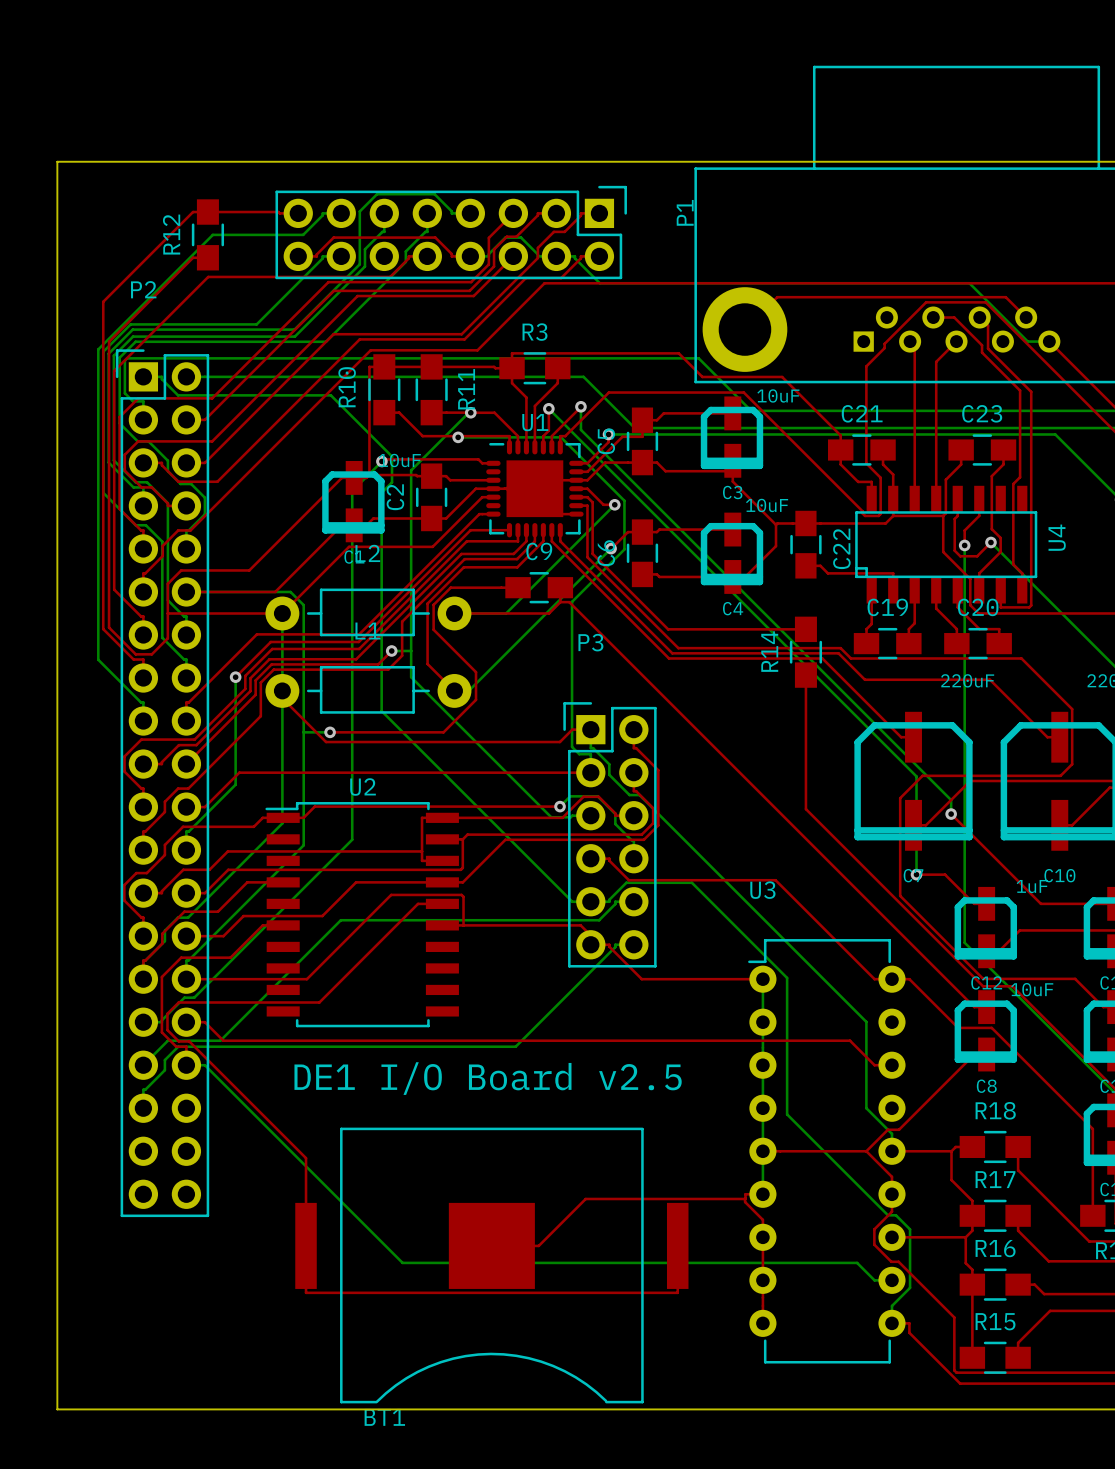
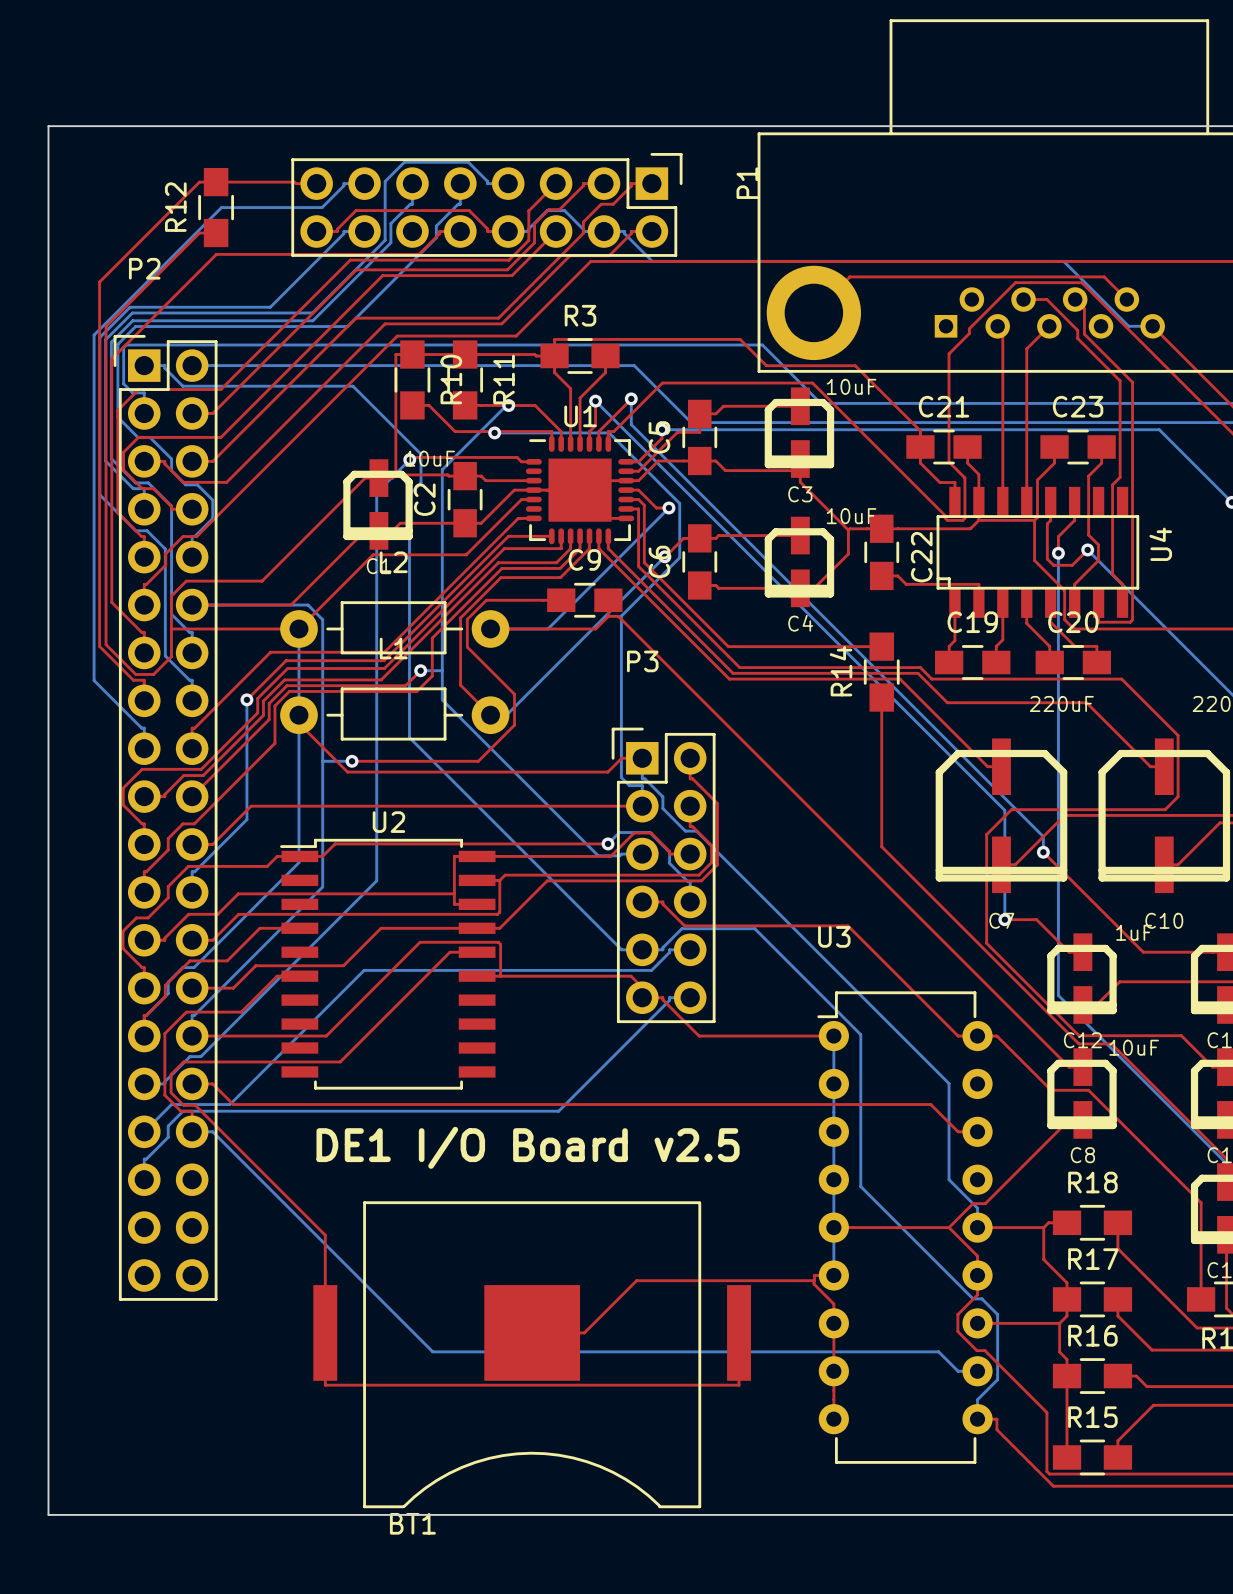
R10 name position: R10 (347, 387) -> R10 (451, 379)
C4 value position: 10uF (767, 505) -> 10uF (851, 516)

